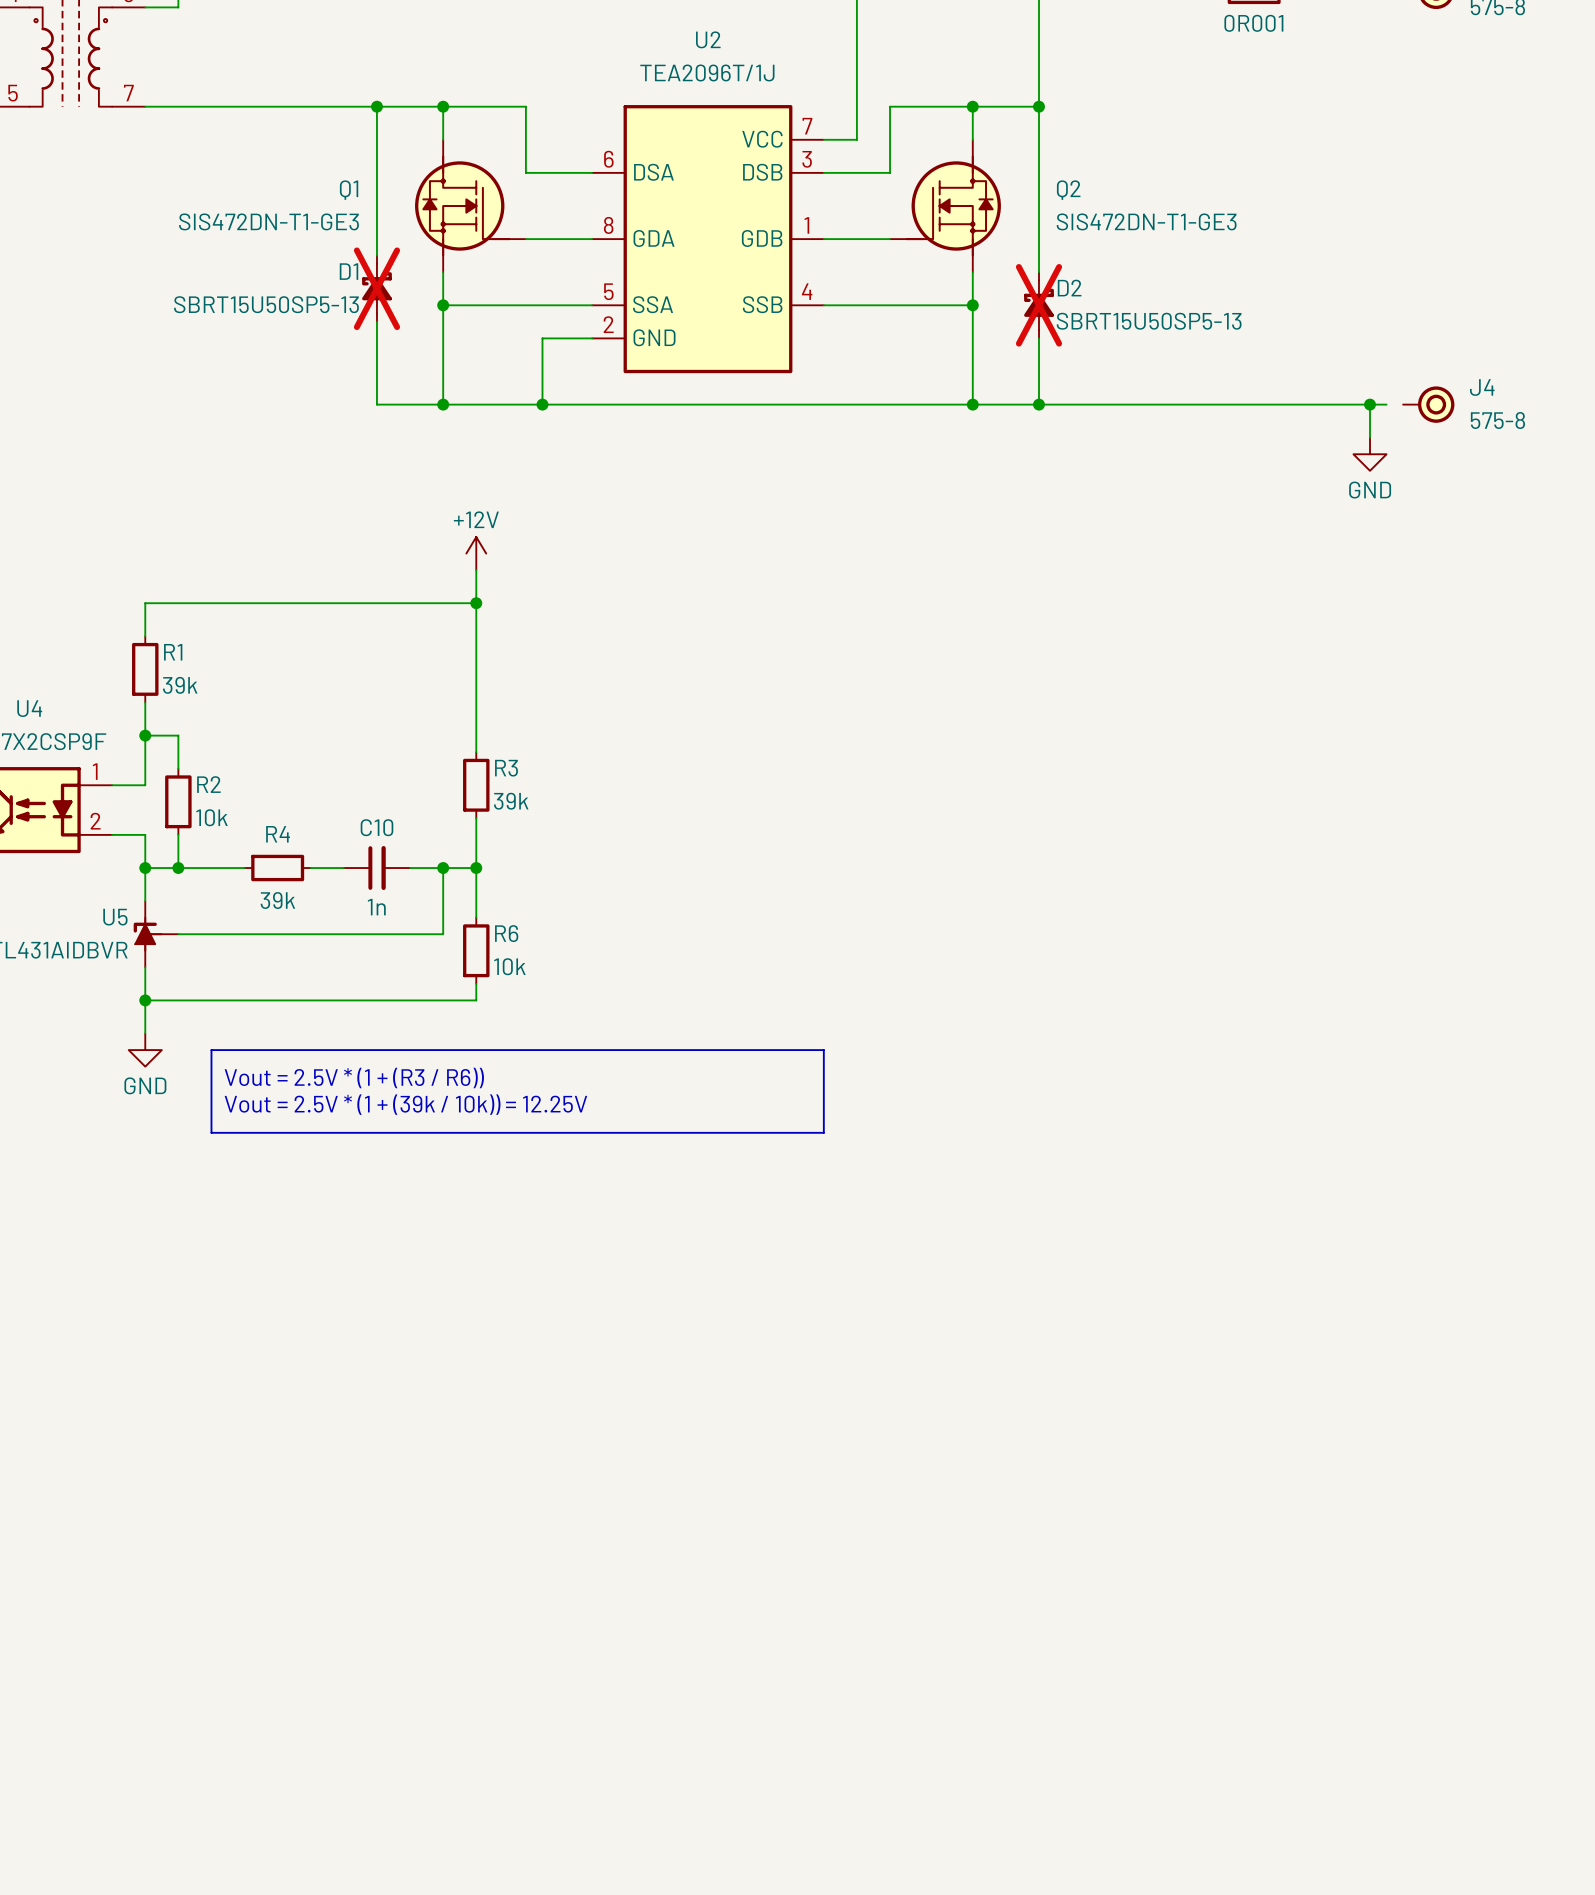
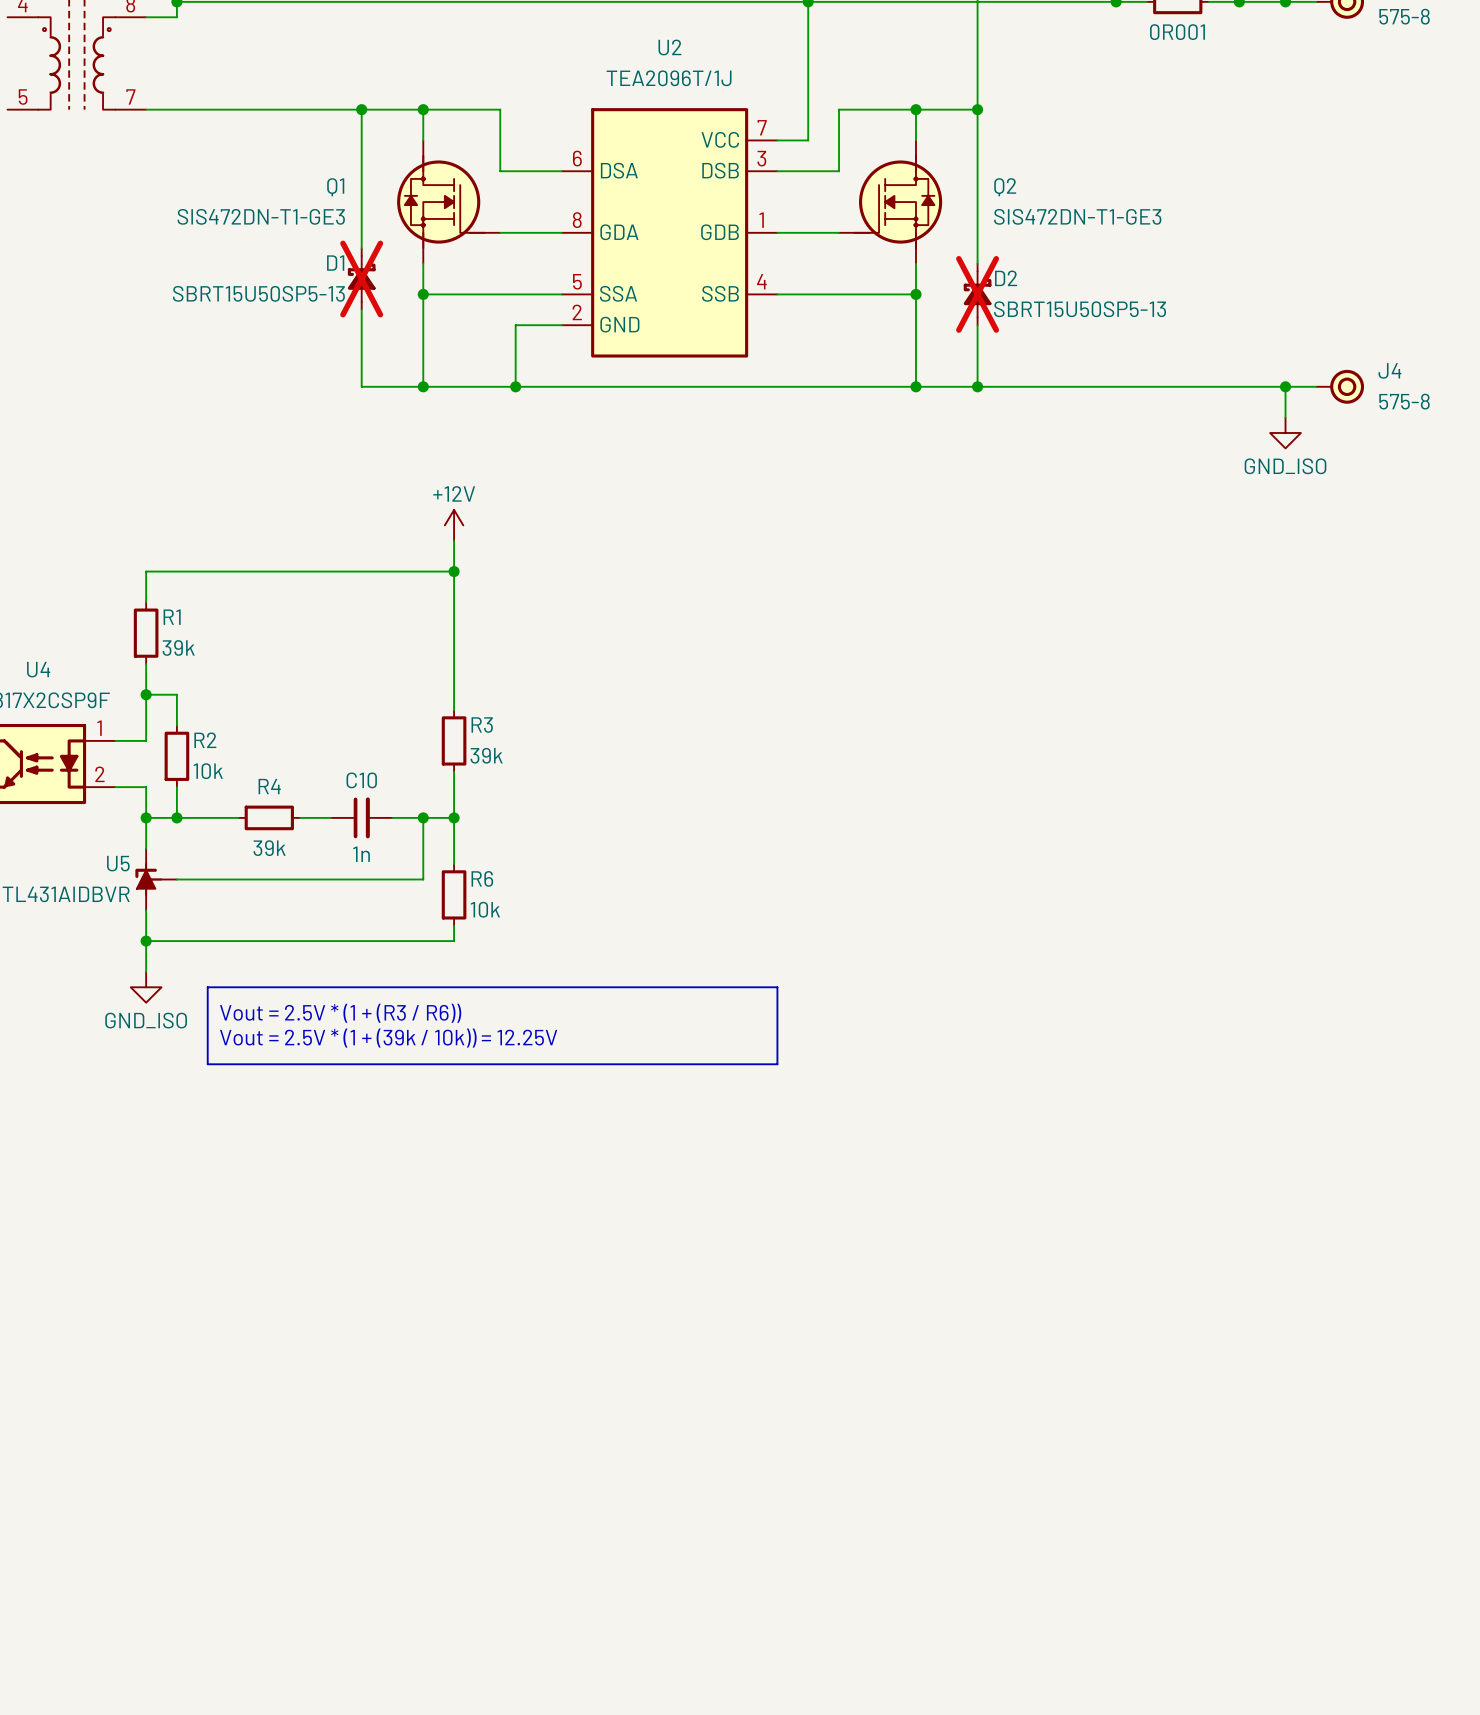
wire: none -> (1300, 386) (1316, 386)
power symbol: GND (1370, 454) -> GND_ISO (1285, 432)
power symbol: GND (145, 1050) -> GND_ISO (146, 987)

